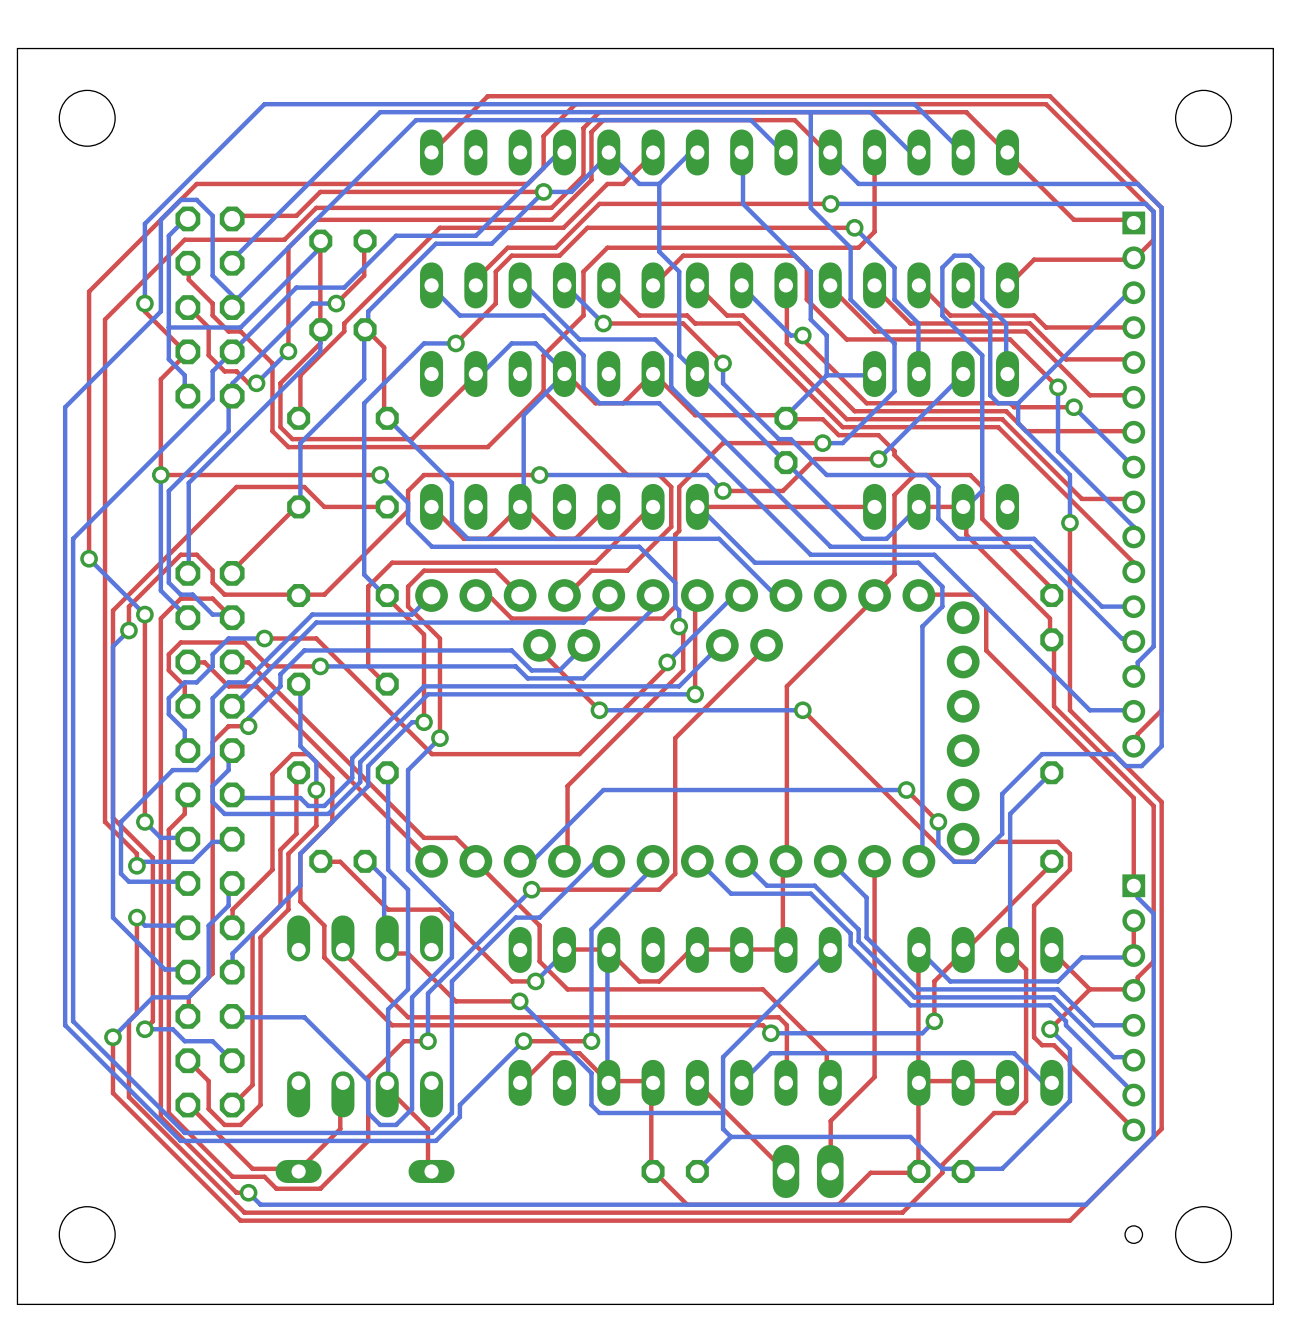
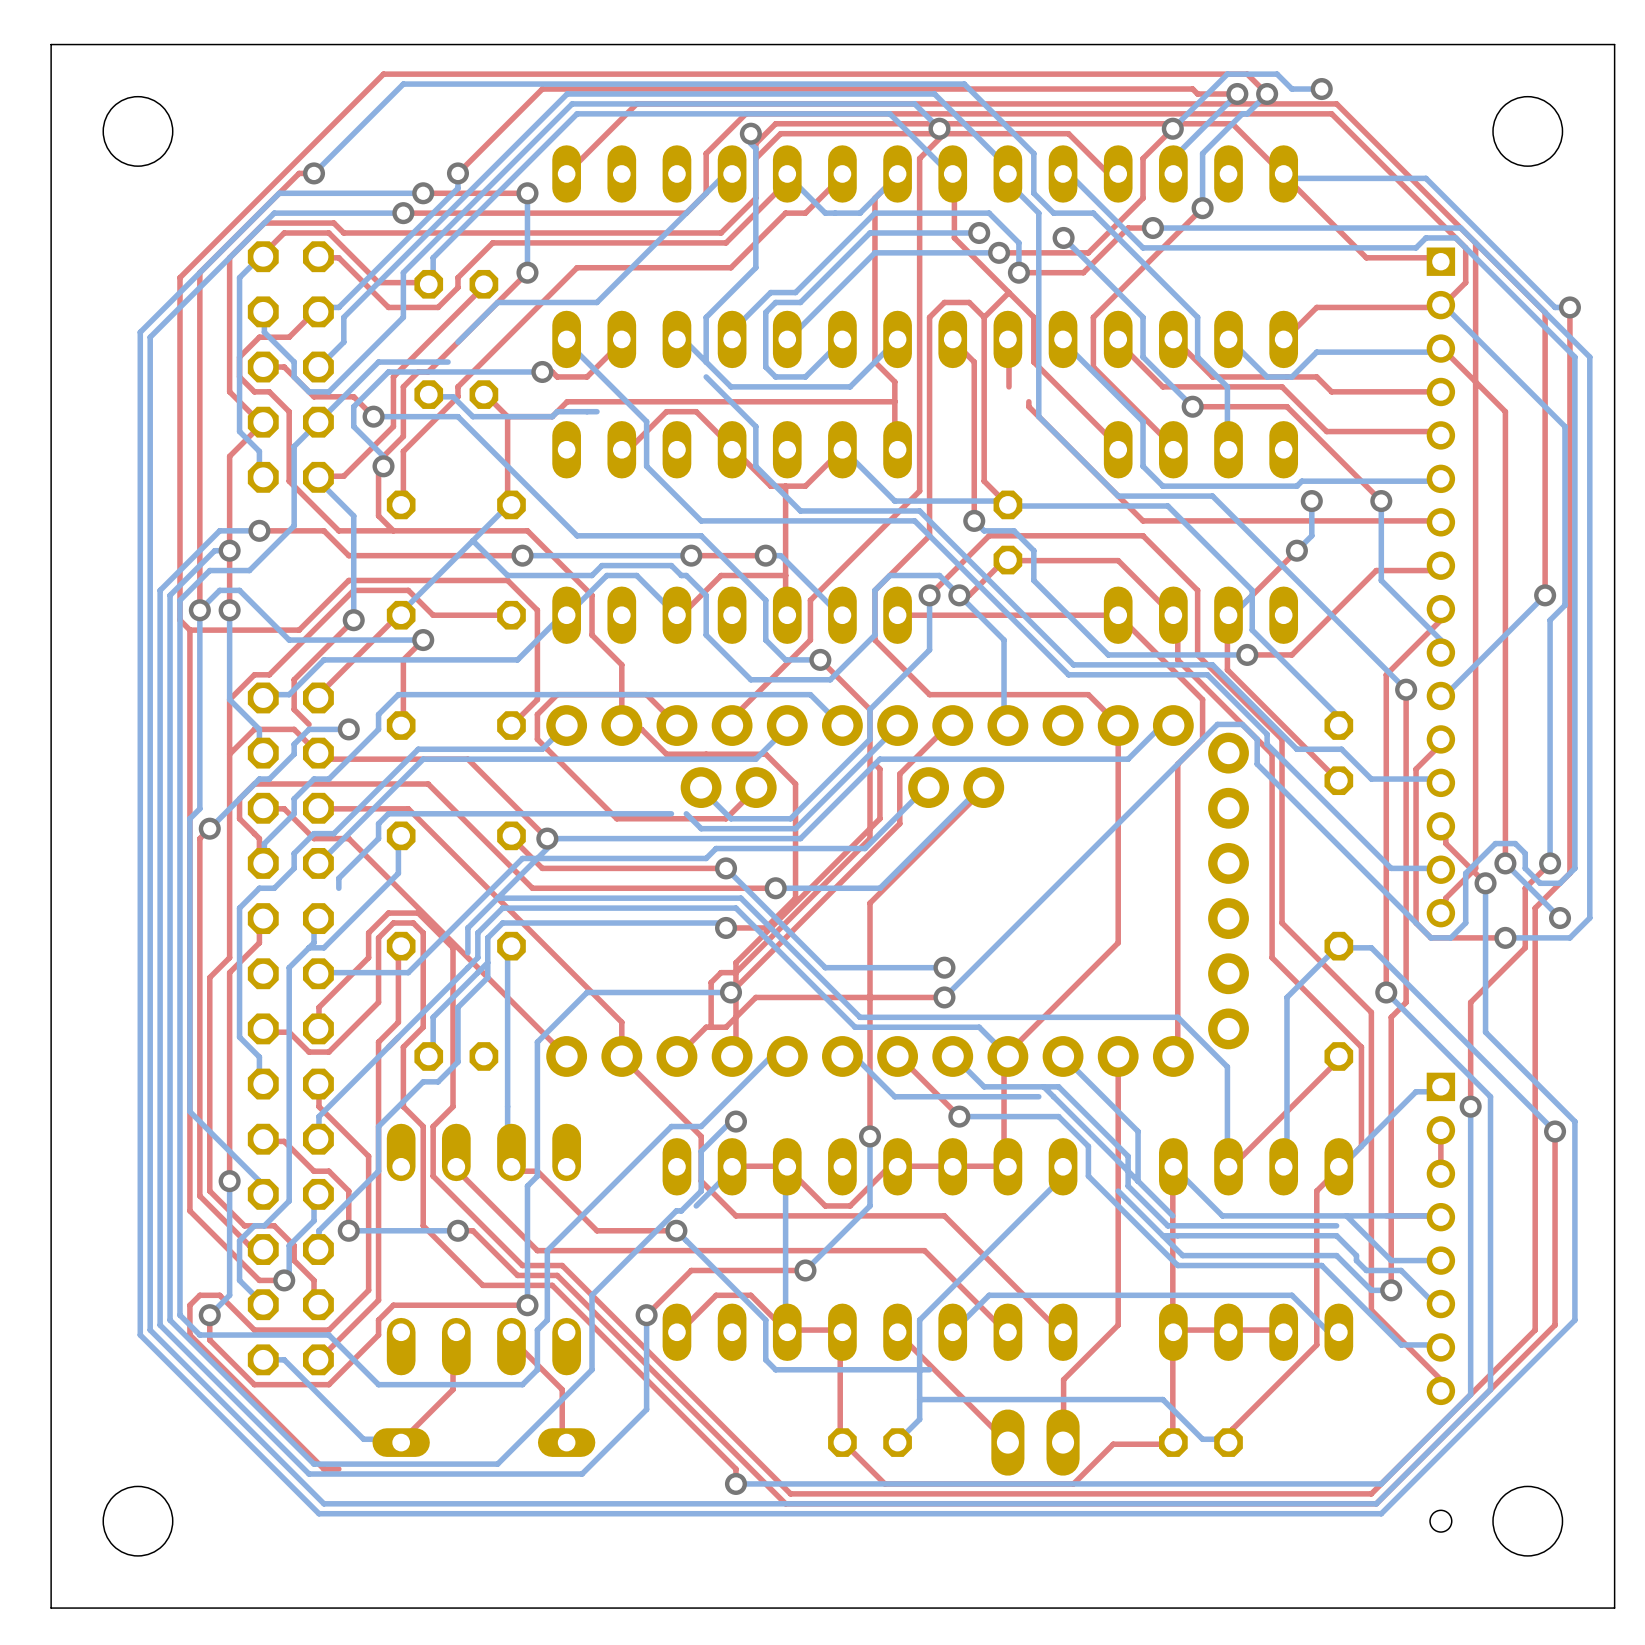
bottom track: none -> (1321, 89) (1291, 89) (1277, 74) (1227, 74) (1172, 128)
via: none -> (1321, 89)
top track: none -> (1237, 93) (1197, 93) (1192, 89) (542, 89) (457, 173)
bottom track: none -> (1237, 93) (1177, 153) (1177, 173) (1173, 173)
via: none -> (1237, 93)
top track: none -> (1267, 93) (1247, 74) (383, 74) (179, 277) (179, 620) (189, 630)
bottom track: none -> (1267, 93) (1247, 113) (1242, 113) (1202, 153) (1202, 208)
via: none -> (1267, 93)
bottom track: (439, 104) (264, 104) (200, 167) -> (423, 193) (279, 193)
bottom track: (691, 104) (914, 104) (963, 152) -> (889, 113) (949, 173) (952, 173)
bottom track: (810, 112) (810, 183) -> (1007, 173) (1004, 178) (1038, 213)
bottom track: none -> (939, 128) (914, 103) (572, 103) (403, 272) (403, 317)
via: none -> (939, 128)
top track: none -> (1172, 128) (1143, 158) (1143, 198) (1088, 252) (999, 252)
via: none -> (1172, 128)
bottom track: none -> (750, 133) (750, 143) (755, 148) (755, 267) (706, 317) (706, 362)
via: none -> (750, 133)
top track: (794, 120) (826, 152) (830, 152) -> (1018, 133) (1068, 133) (1108, 173) (1118, 173)
top track: (591, 132) (591, 179) (551, 219) (316, 219) (288, 247) (288, 351) -> (765, 148) (755, 158)
top track: none -> (314, 173) (299, 173) (199, 272) (199, 610)
via: none -> (314, 173)
via: none -> (457, 173)
bottom track: (608, 152) (571, 191) (543, 191) (491, 243) (435, 243) (368, 311) (368, 327) (364, 331) (364, 379) (300, 443) (300, 506) (298, 506) -> (511, 504) (507, 506) (398, 615) (401, 615)
top track: none -> (897, 173) (874, 198) (874, 362) (894, 381) (894, 446) (897, 449)
top track: none -> (952, 173) (954, 178) (954, 237) (1018, 302)
bottom track: (741, 152) (743, 203) (810, 271) -> (1038, 242) (1038, 322)
bottom track: (782, 152) (750, 120) (416, 120) (228, 307) (232, 307) (236, 299) (212, 275) (212, 215) (196, 199) (180, 199) -> (1004, 173) (1004, 163) (934, 93) (567, 93) (343, 317) (343, 342) (318, 367)
top track: (874, 152) (874, 231) (858, 247) (607, 247) (583, 271) (583, 315) (543, 355) (543, 391) -> none
bottom track: (918, 152) (910, 152) (870, 112) (380, 112) (232, 259) -> (457, 173) (457, 188) (338, 307) (318, 307)
bottom track: none -> (1283, 173) (1286, 178) (1425, 178) (1555, 307) (1569, 307)
bottom track: (695, 156) (687, 156) (659, 183) (659, 251) (679, 271) (679, 355) (862, 538) (866, 538) -> (894, 178) (860, 213) (850, 213)
bottom track: (830, 156) (858, 183) (1137, 183) (1149, 195) -> (1063, 178) (1073, 178) (1143, 247) (1416, 247) (1425, 237)
via: none -> (423, 193)
top track: none -> (527, 193) (423, 193)
bottom track: none -> (527, 193) (527, 272)
via: none -> (527, 193)
top track: (583, 171) (583, 175) (551, 207) -> (787, 173) (790, 178) (726, 242) (716, 242)
top track: none -> (1202, 208) (1093, 317) (1093, 367) (1172, 446) (1173, 449)
via: none -> (1202, 208)
top track: (300, 183) (196, 183) (188, 191) -> (755, 198) (721, 232) (343, 232) (333, 223) (264, 223)
bottom track: none -> (403, 213) (274, 213) (254, 232)
via: none -> (403, 213)
top track: (543, 191) (320, 191) (296, 215) (232, 215) (232, 218) -> none
via: (543, 191) -> none
top track: none -> (1152, 228) (1128, 228) (1083, 272) (1018, 272)
via: none -> (1152, 228)
bottom track: none -> (1460, 228) (1152, 228)
bottom track: none -> (979, 232) (870, 232) (800, 302) (775, 302) (765, 312) (765, 367) (775, 376) (805, 376) (842, 339)
via: none -> (979, 232)
bottom track: none -> (1058, 232) (1093, 267)
top track: (830, 203) (599, 203) (555, 247) (507, 247) (475, 279) (475, 285) -> (542, 371) (552, 371) (557, 376) (587, 376) (621, 342) (621, 339)
bottom track: (1121, 203) (830, 203) -> none
top track: (372, 207) (316, 207) (284, 239) -> (492, 242) (457, 277) (457, 287) (438, 307) (388, 307) (338, 257) (318, 256)
bottom track: (810, 207) (850, 247) (850, 299) (894, 343) (894, 351) -> (1063, 339) (1063, 342) (1143, 421)
top track: none -> (1475, 242) (1545, 312) (1545, 595)
bottom track: (1161, 207) (1161, 746) (1153, 754) -> (1465, 247) (1574, 357) (1574, 868) (1560, 883) (1540, 883) (1525, 868) (1525, 853) (1515, 843) (1495, 843) (1465, 873) (1465, 923)
bottom track: none -> (1475, 242) (1589, 357) (1589, 918) (1569, 937) (1505, 937)
bottom track: (1153, 211) (1153, 646) (1137, 662) (1137, 674) (1133, 676) -> none
bottom track: none -> (999, 252) (874, 252) (787, 339)
via: none -> (999, 252)
top track: none -> (263, 256) (264, 252) (284, 232) (328, 232) (378, 282)
top track: (160, 219) (89, 291) (89, 558) -> none
bottom track: (160, 219) (160, 311) (65, 407) (65, 1025) (113, 1073) -> (229, 257) (150, 337) (150, 1330) (323, 1503) (1376, 1503) (1490, 1389) (1490, 1096) (1386, 992)
bottom track: (144, 223) (144, 303) -> (209, 262) (140, 332) (140, 1335) (318, 1513) (1381, 1513) (1574, 1320) (1574, 1121) (1485, 1032) (1485, 883)
top track: (854, 227) (587, 227) (559, 255) (511, 255) (495, 271) (495, 303) (455, 343) -> none
via: (854, 227) -> none
via: none -> (527, 272)
via: none -> (1018, 272)
bottom track: (475, 235) (396, 235) (376, 255) -> (621, 277) (596, 302) (497, 302)
top track: (280, 239) (184, 239) (105, 319) (105, 821) (136, 853) -> (209, 828) (199, 838) (199, 1047)
top track: none -> (383, 282) (428, 282) (428, 284)
top track: (320, 241) (320, 343) (300, 363) -> (527, 272) (428, 371) (418, 371) (403, 386) (403, 436)
bottom track: (320, 241) (324, 243) (300, 267) -> (428, 284) (433, 282) (433, 257) (577, 113)
top track: (364, 243) (364, 275) (336, 303) -> (482, 287) (393, 376) (393, 426) (343, 476) (318, 477)
top track: none -> (1008, 292) (984, 317)
top track: (735, 255) (683, 255) (653, 285) -> (944, 302) (929, 317) (929, 535)
top track: (794, 255) (754, 255) -> (984, 317) (969, 302)
bottom track: none -> (1440, 305) (1445, 307) (1564, 426) (1564, 605) (1550, 620) (1550, 863)
top track: none -> (1569, 307) (1569, 873) (1535, 908) (1535, 1330) (1475, 1389)
via: none -> (1569, 307)
top track: (187, 263) (188, 279) (212, 303) (212, 315) -> none
top track: none -> (318, 311) (314, 312) (289, 337) (259, 337) (239, 357) (239, 376) (254, 391) (269, 391) (289, 411)
bottom track: (564, 285) (603, 323) -> (732, 339) (735, 337) (735, 327) (770, 292) (795, 292) (874, 213) (989, 213) (1018, 242) (1018, 272)
top track: (608, 285) (639, 315) (687, 315) (695, 323) (739, 323) (842, 427) (998, 427) (1133, 562) (1133, 571) -> none
top track: (697, 285) (727, 315) (743, 315) (846, 419) (1002, 419) (1081, 498) (1133, 498) (1133, 502) -> (1386, 992) (1386, 674) (1440, 620) (1440, 609)
bottom track: none -> (897, 339) (850, 386) (731, 386)
top track: none -> (952, 339) (974, 362) (974, 520)
bottom track: (741, 285) (790, 335) (802, 335) -> none
top track: (830, 285) (874, 331) (1026, 331) (1089, 395) (1133, 395) (1133, 397) -> none
bottom track: (344, 287) (296, 287) (280, 303) -> (418, 362) (378, 362)
bottom track: (966, 287) (966, 295) (990, 319) (990, 395) (998, 403) -> (1143, 466) (1162, 486) (1272, 486)
bottom track: none -> (1232, 342) (1267, 376) (1291, 376) (1316, 352) (1430, 352)
top track: none -> (1440, 348) (1505, 411) (1505, 863)
bottom track: (1125, 295) (1022, 399) -> (1440, 478) (1440, 481) (1301, 481)
top track: (806, 299) (846, 339) (934, 339) -> (1033, 357) (1033, 362) (1118, 446) (1118, 449)
top track: (144, 303) (144, 311) (160, 327) -> (229, 257) (229, 391)
via: (144, 303) -> none
bottom track: (312, 303) (232, 383) (232, 395) (228, 399) (228, 431) (168, 490) (168, 582) -> (229, 699) (239, 709)
via: (336, 303) -> none
top track: (188, 307) (208, 327) (208, 343) -> (264, 367) (284, 367) (294, 376)
bottom track: none -> (542, 371) (388, 371) (353, 406) (353, 426) (383, 456) (383, 466)
via: none -> (542, 371)
bottom track: (543, 315) (459, 315) -> (1068, 674) (914, 520) (701, 520) (646, 466) (646, 421) (601, 376)
bottom track: (810, 319) (826, 335) (826, 375) -> (1038, 381) (1038, 416) (1118, 496) (1212, 496) (1406, 689)
bottom track: (563, 323) (579, 339) (655, 339) (671, 355) (671, 387) (830, 546) (838, 546) -> (775, 486) (800, 510) (919, 510) (1073, 664)
top track: (603, 323) (683, 323) (723, 363) -> none
via: (603, 323) -> none
top track: (786, 323) (786, 343) (854, 411) (1006, 411) (1026, 431) -> none
bottom track: (918, 323) (918, 374) -> (1172, 386) (1192, 406)
top track: (1006, 323) (1030, 323) (1065, 359) -> (1282, 386) (1326, 431) (1356, 431)
bottom track: (224, 327) (168, 327) -> (309, 391) (294, 376) (294, 362) (264, 332) (263, 311)
bottom track: (320, 329) (320, 351) (188, 482) (188, 570) -> (676, 615) (636, 575) (606, 575) (567, 615) (562, 615) (517, 659) (323, 659) (289, 694) (264, 694)
top track: (240, 331) (272, 363) (272, 431) (288, 447) (487, 447) (543, 391) -> (328, 396) (353, 396) (373, 416)
top track: none -> (894, 401) (567, 401) (552, 416) (507, 416)
via: (802, 335) -> none
via: none -> (1192, 406)
via: (455, 343) -> none
bottom track: none -> (373, 416) (457, 416) (577, 535) (701, 535) (765, 600) (765, 640) (785, 659) (820, 659)
bottom track: (420, 347) (364, 403) (364, 574) (387, 595) -> (552, 416) (472, 416) (453, 396) (433, 396) (428, 394)
bottom track: (288, 351) (256, 383) -> none
via position: (288, 351) -> (373, 416)
top track: (208, 355) (224, 371) (236, 371) (248, 383) (256, 383) -> (289, 426) (289, 481) (338, 530) (393, 530)
bottom track: (723, 363) (723, 383) (778, 439) -> (974, 520) (984, 530) (999, 530)
via: (723, 363) -> none
bottom track: (475, 371) (483, 371) (511, 343) (535, 343) (564, 374) (523, 415) (523, 506) (520, 506) -> none
top track: (475, 374) (412, 439) (400, 439) -> (621, 449) (621, 446) (631, 446) (666, 411) (696, 411) (732, 449)
top track: (653, 374) (695, 415) (782, 415) -> (984, 317) (984, 481) (1004, 501)
bottom track: (874, 374) (826, 375) -> none
bottom track: (963, 374) (878, 459) -> (1228, 449) (1227, 386) (1197, 357) (1197, 317) (1093, 213) (1053, 213) (1033, 193) (1033, 153) (964, 84) (403, 84) (314, 173)
bottom track: (1007, 374) (1006, 323) (982, 299) (982, 267) (970, 255) (954, 255) (942, 267) (942, 315) (982, 355) (982, 486) -> (842, 449) (894, 501) (1004, 501) (1008, 506) (1167, 506) (1252, 590)
bottom track: (826, 375) (785, 418) -> none
via: (256, 383) -> none
via: none -> (383, 466)
bottom track: (894, 387) (894, 391) (842, 443) (822, 443) -> none
top track: none -> (1346, 466) (1381, 501)
bottom track: (1058, 387) (1058, 451) (1085, 479) -> (1381, 501) (1381, 580)
via: (1058, 387) -> none
top track: (543, 391) (627, 475) (659, 475) (671, 486) (671, 526) (627, 570) (591, 570) (567, 594) -> (939, 128) (944, 133) (919, 158) (919, 491) (810, 600) (810, 640) (735, 714) (735, 724)
bottom track: none -> (318, 477) (318, 481) (353, 515) (353, 620)
bottom track: (212, 399) (73, 538) (73, 1021) (120, 1069) -> (294, 481) (294, 525) (249, 570) (209, 570) (179, 600) (179, 1007)
bottom track: (599, 403) (659, 403) (731, 475) -> none
top track: none -> (785, 486) (785, 615)
top track: (866, 403) (1010, 403) (1014, 407) (1073, 407) -> (1108, 486) (1143, 520) (1306, 520)
bottom track: (1018, 403) (1018, 423) (1069, 475) (1069, 522) -> none
bottom track: (1073, 407) (1133, 467) -> none
via position: (1073, 407) -> (1381, 501)
bottom track: none -> (1311, 501) (1311, 535) (1296, 550)
via: none -> (1311, 501)
bottom track: (387, 418) (451, 482) (451, 522) (467, 538) (719, 538) (774, 594) (782, 594) -> none
top track: (785, 418) (822, 419) (838, 435) (878, 435) (914, 475) -> none
via: none -> (974, 520)
top track: none -> (259, 530) (323, 530) (348, 555) (522, 555)
bottom track: none -> (259, 530) (219, 530) (160, 590) (160, 1325) (309, 1474) (582, 1474) (646, 1409) (646, 1315)
via: none -> (259, 530)
top track: none -> (527, 530) (592, 595) (592, 635) (621, 664) (621, 725)
top track: (770, 443) (723, 443) -> (989, 535) (929, 595)
via: (822, 443) -> none
via: none -> (229, 550)
bottom track: (806, 455) (826, 475) (926, 475) (938, 486) (938, 518) (958, 538) -> (1033, 550) (1033, 580) (1108, 654)
top track: none -> (1296, 550) (1232, 615)
via: none -> (1296, 550)
bottom track: none -> (691, 555) (522, 555)
top track: none -> (765, 555) (691, 555)
bottom track: none -> (765, 555) (780, 555) (840, 615) (842, 615)
via: none -> (765, 555)
top track: (878, 459) (814, 459) (782, 490) (754, 490) -> (1173, 615) (1118, 560) (1004, 560) (969, 595)
via: (878, 459) -> none
top track: none -> (1440, 565) (1440, 570) (1376, 570) (1291, 654) (1247, 654)
bottom track: (160, 475) (160, 502) -> none
via: (160, 475) -> none
top track: (380, 475) (160, 475) -> (229, 610) (229, 575)
bottom track: (380, 475) (408, 502) (408, 522) (431, 546) (639, 546) (675, 582) -> (929, 595) (929, 649) (870, 709)
via position: (380, 475) -> (522, 555)
top track: (539, 475) (424, 475) (408, 490) (408, 502) -> (189, 630) (299, 630) (348, 580) (507, 580) (537, 610)
via position: (539, 475) -> (691, 555)
bottom track: (691, 475) (539, 475) -> (889, 575) (874, 590) (874, 635) (830, 679) (750, 679) (706, 635) (706, 595) (686, 575) (681, 575) (671, 565) (601, 565) (592, 575) (507, 575) (472, 540)
bottom track: (707, 475) (723, 490) -> (909, 575) (939, 575)
top track: (914, 475) (894, 494) (894, 574) (874, 594) -> (874, 640) (929, 694) (1088, 694) (1118, 724)
top track: (914, 475) (970, 475) (982, 486) (982, 518) (1050, 586) (1050, 594) (1051, 595) -> none
top track: (260, 486) (236, 486) (113, 610) (113, 817) (152, 857) (152, 1021) (144, 1029) -> (353, 590) (269, 674)
top track: (746, 490) (723, 490) -> none
via: none -> (959, 595)
bottom track: none -> (1252, 595) (1252, 630) (1336, 714) (1336, 724) (1338, 725)
bottom track: none -> (1545, 595) (1445, 694) (1440, 696)
via: none -> (1545, 595)
via: none -> (199, 610)
via: none -> (229, 610)
top track: (520, 506) (487, 538) (463, 538) (431, 506) -> none
top track: (607, 506) (575, 538) (555, 538) (523, 506) -> (785, 575) (721, 575) (681, 615)
top track: (653, 506) (595, 562) (392, 562) (368, 586) (368, 666) (387, 684) -> (726, 868) (542, 868) (511, 835)
bottom track: (697, 506) (754, 562) (918, 562) (942, 586) (942, 606) -> none
top track: none -> (1118, 615) (1202, 699) (1202, 739) (1177, 764) (1177, 1052) (1173, 1056)
bottom track: (918, 506) (886, 538) -> (1222, 654) (1133, 654)
top track: (962, 506) (922, 506) -> (1242, 724) (1177, 659) (1177, 615)
top track: (966, 506) (966, 534) (1050, 618) (1050, 638) -> (1227, 615) (1227, 669) (1336, 779)
via: none -> (353, 620)
top track: (408, 510) (324, 594) (300, 594) -> (537, 620) (537, 699) (511, 725)
top track: none -> (189, 630) (189, 739)
top track: (1069, 522) (1069, 710) (1113, 754) -> (1440, 739) (1440, 744) (1416, 769) (1416, 923)
via: (1069, 522) -> none
top track: none -> (423, 640) (403, 659) (403, 724)
bottom track: none -> (423, 640) (289, 640) (239, 590) (219, 590) (199, 610) (199, 808) (189, 818) (189, 1111) (259, 1181) (259, 1191)
via: none -> (423, 640)
top track: (679, 526) (679, 530) (675, 534) (675, 582) -> (820, 659) (870, 709)
bottom track: (782, 526) (810, 554) (834, 554) -> (1004, 640) (1004, 724)
bottom track: (978, 538) (1034, 538) (1101, 606) (1133, 606) -> none
via: none -> (1247, 654)
via: none -> (820, 659)
bottom track: (950, 546) (1030, 546) (1121, 638) -> (1212, 664) (1296, 749) (1341, 749) (1371, 779) (1425, 779)
top track: (192, 554) (196, 554) (212, 570) -> (353, 620) (294, 679) (294, 694)
bottom track: (934, 554) (974, 594) -> (1202, 739) (1217, 724) (1242, 724)
bottom track: none -> (1192, 674) (1207, 674) (1267, 734) (1267, 744) (1391, 868)
bottom track: (89, 558) (144, 614) -> none
via: (89, 558) -> none
top track: none -> (1406, 689) (1406, 1002) (1391, 1017) (1391, 1290)
via: none -> (1406, 689)
top track: (160, 574) (128, 606) -> (229, 699) (229, 754)
bottom track: (160, 574) (160, 590) (184, 614) -> (254, 724) (259, 729) (259, 749)
bottom track: (180, 594) (192, 594) (212, 614) (228, 614) (232, 617) -> none
top track: (224, 594) (298, 595) -> none
top track: (974, 594) (918, 595) -> none
top track: (387, 595) (424, 634) (424, 722) -> none
bottom track: (653, 595) (651, 610) (583, 678) -> (897, 725) (795, 828) (755, 828)
top track: (697, 595) (695, 598) (695, 694) -> none
top track: none -> (952, 725) (949, 724) (899, 774) (899, 823) (731, 992)
bottom track: (741, 595) (739, 598) (731, 598) (667, 662) -> none
bottom track: none -> (348, 729) (309, 729) (294, 744) (294, 754) (269, 779) (259, 779) (209, 828)
top track: (874, 598) (786, 686) (786, 857) -> (1118, 729) (1118, 942) (1008, 1052)
top track: (675, 606) (663, 618) (591, 618) -> (726, 927) (765, 927) (795, 898) (795, 784) (765, 754)
top track: none -> (870, 739) (870, 838) (735, 972) (721, 972) (711, 982) (711, 1027)
bottom track: (675, 606) (679, 610) (679, 626) -> (870, 739) (790, 818) (731, 818) (701, 787)
top track: (986, 606) (986, 650) (1133, 797) (1133, 885) -> (1257, 739) (1272, 754) (1272, 957) (1346, 1032)
bottom track: (986, 606) (1089, 710) (1093, 710) -> (1257, 739) (1257, 764) (1416, 923)
top track: (144, 614) (144, 797) -> none
via: (144, 614) -> none
top track: none -> (318, 753) (323, 759) (467, 759) (547, 838)
via: (679, 626) -> none
bottom track: (922, 626) (922, 857) (918, 861) -> (1177, 764) (944, 997)
top track: none -> (189, 769) (189, 1210) (259, 1280) (284, 1280)
bottom track: (128, 630) (113, 646) -> (229, 550) (214, 550) (170, 595) (170, 788)
via: (128, 630) -> none
top track: (264, 638) (316, 638) (320, 642) -> (333, 784) (428, 784)
bottom track: (264, 638) (240, 638) -> (842, 725) (810, 694) (398, 694) (378, 714) (378, 729) (328, 779)
via position: (264, 638) -> (348, 729)
top track: (439, 638) (439, 738) -> (577, 779) (616, 818) (726, 818) (756, 787)
top track: (1051, 639) (1054, 642) (1054, 706) (1153, 805) (1153, 961) (1137, 977) (1137, 989) (1133, 990) -> none
top track: (244, 642) (268, 666) (320, 666) -> none
top track: (539, 645) (535, 646) (599, 710) -> none
bottom track: (583, 645) (559, 670) (531, 670) -> none
bottom track: none -> (983, 787) (979, 788) (879, 888) (775, 888)
top track: (248, 662) (424, 837) (455, 837) (475, 857) -> (338, 808) (408, 808) (621, 1022) (621, 1052)
top track: (667, 662) (667, 666) (579, 754) (431, 754) (404, 726) -> (775, 888) (532, 888)
via: (667, 662) -> none
via: (320, 666) -> none
bottom track: (515, 666) (527, 678) (539, 678) -> (691, 818) (701, 828)
bottom track: (527, 666) (511, 650) (304, 650) (288, 666) -> (428, 813) (388, 813)
top track: none -> (1440, 826) (1445, 828) (1445, 843) (1485, 883)
via: none -> (209, 828)
bottom track: (196, 682) (184, 682) (168, 698) (168, 714) (184, 730) (184, 750) (187, 750) -> (274, 833) (264, 843) (263, 863)
bottom track: (298, 684) (300, 686) (300, 746) (316, 762) (316, 790) -> (401, 835) (398, 838) (398, 873) (323, 947) (309, 947)
via: none -> (547, 838)
bottom track: (679, 686) (619, 686) -> (1173, 725) (1172, 729) (1157, 729) (1128, 759) (879, 759) (800, 838)
bottom track: (551, 694) (428, 694) (380, 742) -> (716, 848) (706, 858) (522, 858) (408, 972) (318, 973)
bottom track: (695, 694) (671, 694) -> (874, 838) (865, 848)
via: (695, 694) -> none
bottom track: none -> (1505, 863) (1560, 918)
via: none -> (1505, 863)
top track: none -> (1550, 863) (1525, 888) (1525, 947) (1470, 1002) (1470, 1106)
via: none -> (1550, 863)
bottom track: (212, 710) (212, 754) (196, 770) (172, 770) (120, 821) -> (294, 868) (274, 888) (259, 888) (239, 908) (239, 1037) (259, 1057) (259, 1081)
via: none -> (726, 868)
via position: (599, 710) -> (775, 888)
top track: (802, 710) (954, 861) (974, 861) (994, 841) (1058, 841) -> none
bottom track: (802, 710) (599, 710) -> none
via: (802, 710) -> none
bottom track: (424, 722) (412, 722) (380, 754) -> (726, 927) (721, 923) (502, 923)
via: (424, 722) -> none
via: none -> (1485, 883)
top track: (248, 726) (228, 726) (212, 742) (212, 973) (188, 997) (187, 1016) -> none
via: (248, 726) -> none
bottom track: (439, 738) (408, 770) (408, 849) -> (731, 992) (587, 992) (537, 1042)
via: (439, 738) -> none
bottom track: none -> (502, 908) (735, 908) (855, 1027) (979, 1027) (1007, 1056)
top track: none -> (263, 918) (259, 923) (259, 942) (229, 972)
via: none -> (1560, 918)
bottom track: (1113, 754) (1042, 754) (1002, 794) (1002, 833) (974, 861) (954, 861) -> (1228, 1166) (1227, 1066) (1217, 1057)
via: none -> (726, 927)
top track: (316, 762) (332, 778) (332, 821) (316, 837) -> (423, 932) (423, 967)
top track: (280, 766) (272, 774) -> (378, 937) (378, 1002) (328, 1052) (309, 1052) (289, 1032) (264, 1032) (263, 1028)
top track: (1125, 766) (1161, 801) (1161, 1128) -> (1430, 937) (1505, 937)
via: none -> (1505, 937)
bottom track: (387, 772) (388, 869) (408, 889) -> (511, 946) (507, 947) (507, 1076)
bottom track: none -> (1338, 946) (1341, 947) (1371, 947) (1555, 1131)
bottom track: (352, 778) (324, 805) (308, 805) (300, 797) (232, 797) (232, 794) -> none
top track: (160, 782) (160, 794) -> (229, 957) (209, 977)
top track: (272, 782) (272, 869) (232, 909) (232, 927) -> (368, 957) (318, 1007) (318, 1028)
bottom track: (212, 786) (212, 801) (224, 813) (328, 813) -> (318, 1139) (318, 1116) (438, 997)
via: (316, 790) -> none
bottom track: (639, 790) (603, 790) (535, 857) (523, 857) (520, 861) -> (825, 967) (726, 868)
via: none -> (944, 967)
top track: (906, 790) (938, 821) -> none
bottom track: (906, 790) (735, 790) -> none
via: (906, 790) -> none
top track: (187, 794) (184, 797) (184, 813) (168, 829) (168, 1113) -> (209, 1315) (209, 1339) (239, 1369)
via: none -> (731, 992)
via: none -> (1386, 992)
top track: none -> (944, 997) (755, 997) (726, 1027) (706, 1027) (676, 1056)
via: none -> (944, 997)
top track: none -> (209, 1007) (209, 1191) (244, 1225) (274, 1225) (294, 1245) (294, 1260) (314, 1280) (314, 1300) (318, 1304)
bottom track: (144, 821) (160, 837) (187, 839) -> none
via: (144, 821) -> none
bottom track: (938, 821) (938, 845) -> (497, 898) (740, 898) (860, 1017) (1177, 1017) (1197, 1037)
via: (938, 821) -> none
top track: (316, 825) (296, 845) -> (423, 1012) (423, 1027)
bottom track: (324, 829) (300, 853) (300, 885) (232, 953) (232, 972) -> (433, 1017) (433, 1052) (428, 1056)
bottom track: (232, 839) (228, 841) (212, 841) (192, 861) (140, 861) (136, 865) -> none
top track: (288, 853) (288, 909) (260, 937) (260, 1105) -> (527, 1305) (393, 1305) (378, 1320) (378, 1335) (353, 1359)
top track: (320, 861) (340, 861) (388, 909) (439, 909) (511, 981) (535, 981) -> none
bottom track: (365, 861) (368, 861) (384, 877) -> none
bottom track: (653, 861) (651, 861) (651, 869) (591, 929) (591, 1041) -> none
top track: none -> (897, 1056) (959, 1116)
bottom track: (697, 861) (731, 893) -> (842, 1056) (855, 1057) (894, 1096) (939, 1096)
top track: none -> (199, 1061) (199, 1126)
via: (136, 865) -> none
bottom track: (408, 869) (451, 913) (451, 957) (412, 997) (412, 1109) (408, 1113) -> (537, 1066) (537, 1091)
top track: (1069, 869) (1034, 905) (1034, 969) -> (1361, 1066) (1361, 1146) (1338, 1166) (1316, 1191)
bottom track: (120, 873) (128, 881) (184, 881) -> (179, 1071) (179, 1315)
top track: (675, 873) (659, 889) (531, 889) -> (870, 1071) (870, 1136)
top track: none -> (318, 1084) (318, 1106) (368, 1156) (368, 1290) (328, 1330) (254, 1330) (219, 1295) (199, 1295) (189, 1305)
bottom track: (232, 883) (228, 885) (228, 905) (208, 925) -> (294, 962) (289, 967) (289, 1136)
bottom track: none -> (1043, 1086) (1058, 1086) (1128, 1156) (1128, 1186)
bottom track: (1133, 885) (1137, 889) (1137, 897) (1153, 913) (1153, 1136) -> (1470, 1106) (1470, 1394) (1465, 1399)
bottom track: none -> (1440, 1086) (1440, 1091) (1416, 1091) (1341, 1166) (1338, 1166)
bottom track: (531, 889) (428, 993) (428, 1041) -> none
via: (531, 889) -> none
bottom track: (810, 893) (826, 909) -> (959, 1116) (1058, 1116)
bottom track: (866, 897) (866, 937) -> (1108, 1101) (1138, 1131) (1138, 1181)
via: none -> (1470, 1106)
top track: (280, 905) (252, 933) (252, 1085) -> (378, 1111) (378, 1300) (343, 1335)
via: none -> (959, 1116)
bottom track: none -> (735, 1121) (731, 1121) (701, 1151) (701, 1191) (681, 1210) (676, 1210) (592, 1295)
via: none -> (735, 1121)
bottom track: (113, 917) (164, 969) (184, 969) -> (170, 1126) (170, 1320)
bottom track: (136, 917) (144, 925) (184, 925) (187, 927) -> none
via: (136, 917) -> none
top track: (316, 917) (324, 925) -> (368, 947) (368, 932) (388, 913) (418, 913) (453, 947) (453, 1106) (433, 1126) (433, 1136)
top track: none -> (423, 1126) (423, 1225) (482, 1285) (552, 1285) (735, 1469) (735, 1483)
top track: none -> (1555, 1131) (1555, 1325) (1376, 1503) (1361, 1503)
via: none -> (1555, 1131)
bottom track: none -> (870, 1136) (870, 1205) (805, 1270)
via: none -> (870, 1136)
top track: none -> (263, 1139) (264, 1141) (284, 1141) (314, 1171) (328, 1171) (348, 1191) (348, 1230)
bottom track: (858, 929) (858, 941) (882, 965) -> (1098, 1141) (1108, 1151)
bottom track: (850, 945) (874, 969) -> (1088, 1161) (1088, 1176) (1177, 1265) (1321, 1265) (1401, 1344) (1440, 1344)
top track: (963, 949) (962, 953) (934, 981) (934, 1021) -> none
top track: (1007, 949) (1026, 969) (1026, 1101) -> (1316, 1275) (1316, 1344) (1306, 1354)
top track: (1051, 949) (1089, 989) (1050, 1029) -> none
bottom track: (826, 953) (723, 1057) (723, 1128) (731, 1136) (715, 1152) -> (1058, 1171) (1058, 1181) (919, 1320) (919, 1419)
bottom track: (1133, 955) (1133, 957) (1081, 957) (1058, 981) (950, 981) -> none
bottom track: (408, 957) (408, 989) (388, 1009) (387, 1082) -> (537, 1176) (527, 1186) (527, 1305)
top track: (160, 961) (160, 1116) -> (189, 1335) (229, 1374)
bottom track: none -> (229, 1181) (229, 1295) (209, 1315)
via: none -> (229, 1181)
bottom track: none -> (318, 1194) (314, 1196) (314, 1220) (289, 1245) (289, 1275) (284, 1280)
top track: (136, 973) (136, 1013) (128, 1021) (128, 1061) -> (199, 1196) (249, 1245) (259, 1245) (263, 1249)
bottom track: (451, 981) (451, 1053) -> (592, 1205) (547, 1250) (547, 1320) (537, 1330) (537, 1369)
via: (535, 981) -> none
top track: (735, 989) (762, 989) (826, 1053) (826, 1081) -> (944, 1215) (1058, 1330)
bottom track: (958, 989) (918, 989) -> (1222, 1215) (1212, 1205)
bottom track: none -> (1346, 1215) (1440, 1217)
bottom track: (180, 997) (152, 997) (113, 1037) -> (254, 1225) (239, 1240) (239, 1280) (263, 1304)
bottom track: (1050, 997) (1054, 997) (1113, 1057) (1125, 1057) -> none
via: none -> (348, 1230)
bottom track: none -> (457, 1230) (348, 1230)
via: none -> (457, 1230)
bottom track: none -> (1162, 1235) (1182, 1255) (1336, 1255) (1371, 1290) (1391, 1290)
bottom track: (232, 1016) (304, 1017) (368, 1081) (368, 1113) (380, 1124) -> (318, 1249) (318, 1230) (378, 1171) (378, 1126) (423, 1081) (438, 1081) (457, 1061) (457, 1007) (487, 977) (487, 962)
top track: (719, 1017) (778, 1017) (786, 1025) (785, 1082) -> (924, 1250) (1007, 1332)
bottom track: (934, 1021) (922, 1033) (770, 1033) -> none
via: (934, 1021) -> none
top track: (392, 1025) (762, 1025) (770, 1033) -> (517, 1260) (522, 1265) (562, 1265) (790, 1493)
bottom track: (144, 1029) (172, 1029) (184, 1041) (212, 1041) (232, 1060) -> none
via: (144, 1029) -> none
bottom track: (1050, 1029) (1069, 1049) (1069, 1101) (1002, 1168) (966, 1168) (963, 1171) -> none
via position: (1050, 1029) -> (1391, 1290)
top track: none -> (805, 1270) (691, 1270) (646, 1315)
via: (770, 1033) -> none
bottom track: (1073, 1033) (1133, 1093) -> (1366, 1270) (1401, 1270) (1430, 1300)
top track: (113, 1037) (113, 1093) (240, 1220) (607, 1220) -> (457, 1230) (472, 1230) (517, 1275) (557, 1275) (785, 1503)
via: (113, 1037) -> none
top track: (1034, 1037) (1042, 1045) (1054, 1045) (1069, 1061) (1069, 1065) (1133, 1128) -> (1053, 535) (1143, 535) (1197, 590) (1197, 654) (1282, 739) (1282, 923) (1371, 1012) (1371, 1310) (1440, 1379) (1440, 1389)
via: none -> (284, 1280)
top track: (428, 1041) (404, 1041) (368, 1077) (368, 1140) (320, 1188) (276, 1188) (264, 1176) (232, 1176) (180, 1124) -> none
via position: (428, 1041) -> (527, 1305)
bottom track: (523, 1041) (459, 1105) (459, 1116) (435, 1140) (180, 1140) -> (567, 1394) (497, 1464) (314, 1464) (254, 1404)
via: (523, 1041) -> none
top track: (591, 1041) (523, 1041) -> none
via position: (591, 1041) -> (805, 1270)
top track: (187, 1060) (208, 1081) (208, 1109) (224, 1124) -> (254, 1384) (309, 1384)
via: none -> (209, 1315)
via: none -> (646, 1315)
top track: (128, 1085) (128, 1097) (244, 1212) (611, 1212) -> none
bottom track: (136, 1085) (184, 1132) (431, 1132) -> (199, 1335) (328, 1335) (378, 1384) (502, 1384)
top track: (187, 1105) (252, 1168) (296, 1168) (298, 1171) -> none
bottom track: none -> (263, 1359) (284, 1359) (363, 1439) (398, 1439) (401, 1442)
top track: (1014, 1113) (994, 1113) (942, 1164) (942, 1172) (902, 1212) -> (1291, 1369) (1232, 1429) (1232, 1439) (1228, 1442)
bottom track: none -> (939, 1399) (919, 1399)
bottom track: (248, 1192) (260, 1204) (567, 1204) -> none
via: (248, 1192) -> none
via: none -> (735, 1483)
top track: (1077, 1212) (1069, 1220) -> (1371, 1493) (1152, 1493)

